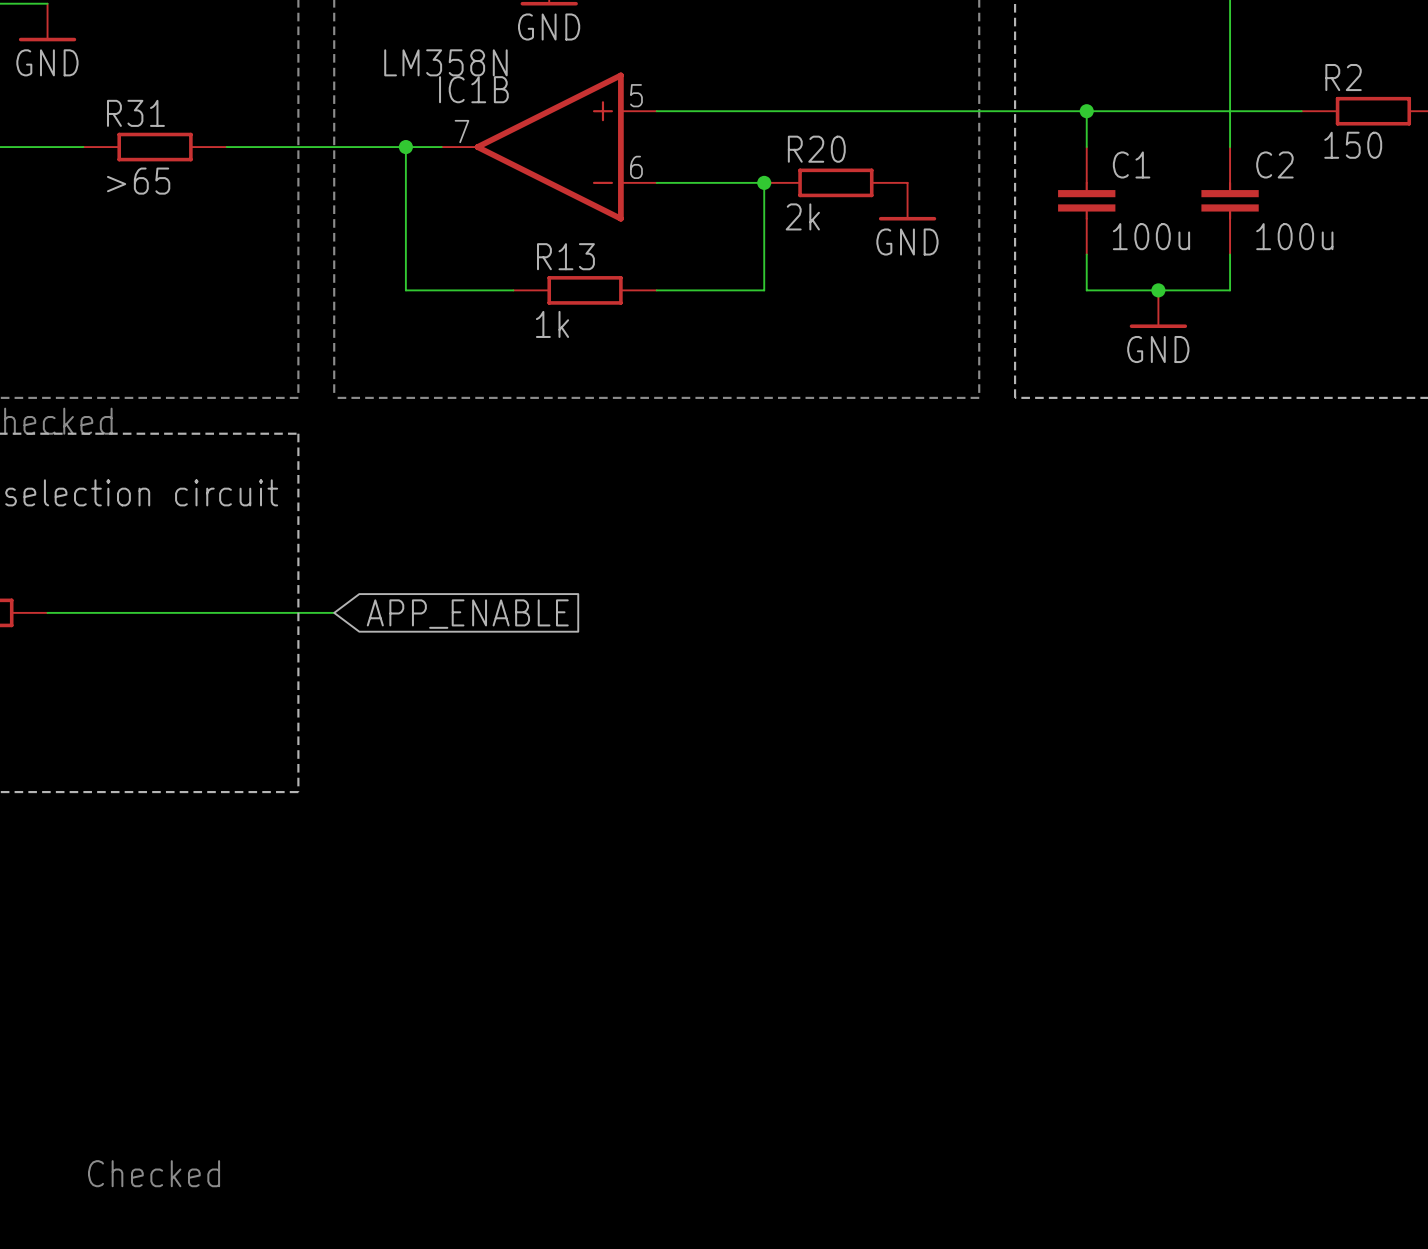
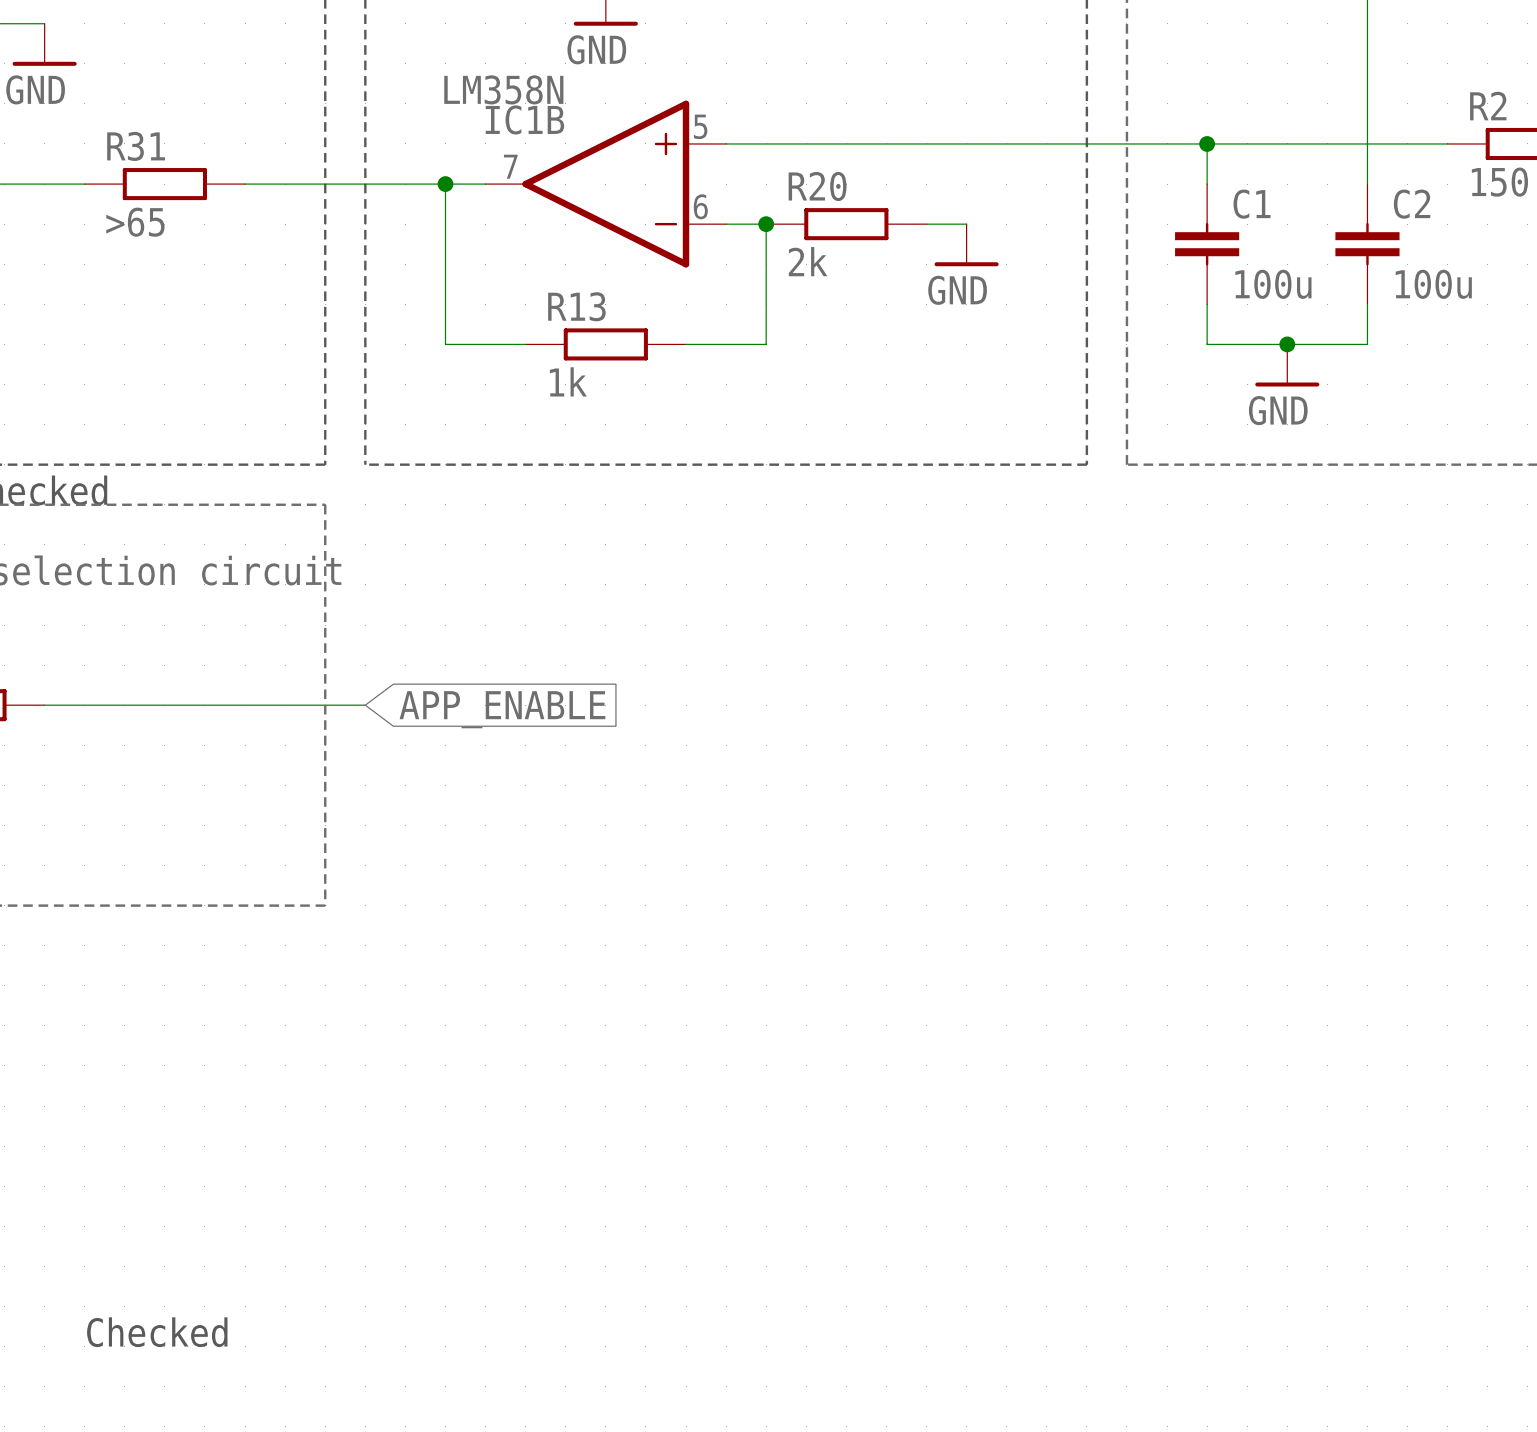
wire: (692, 182) (764, 182) (764, 290) (692, 290) -> (766, 224) (766, 344)
junction position: (764, 182) -> (766, 224)
wire: none -> (926, 224) (966, 224)
R20 position: (835, 182) -> (846, 224)
power symbol position: GND (907, 201) -> GND (966, 245)
R13 position: (585, 290) -> (605, 344)

